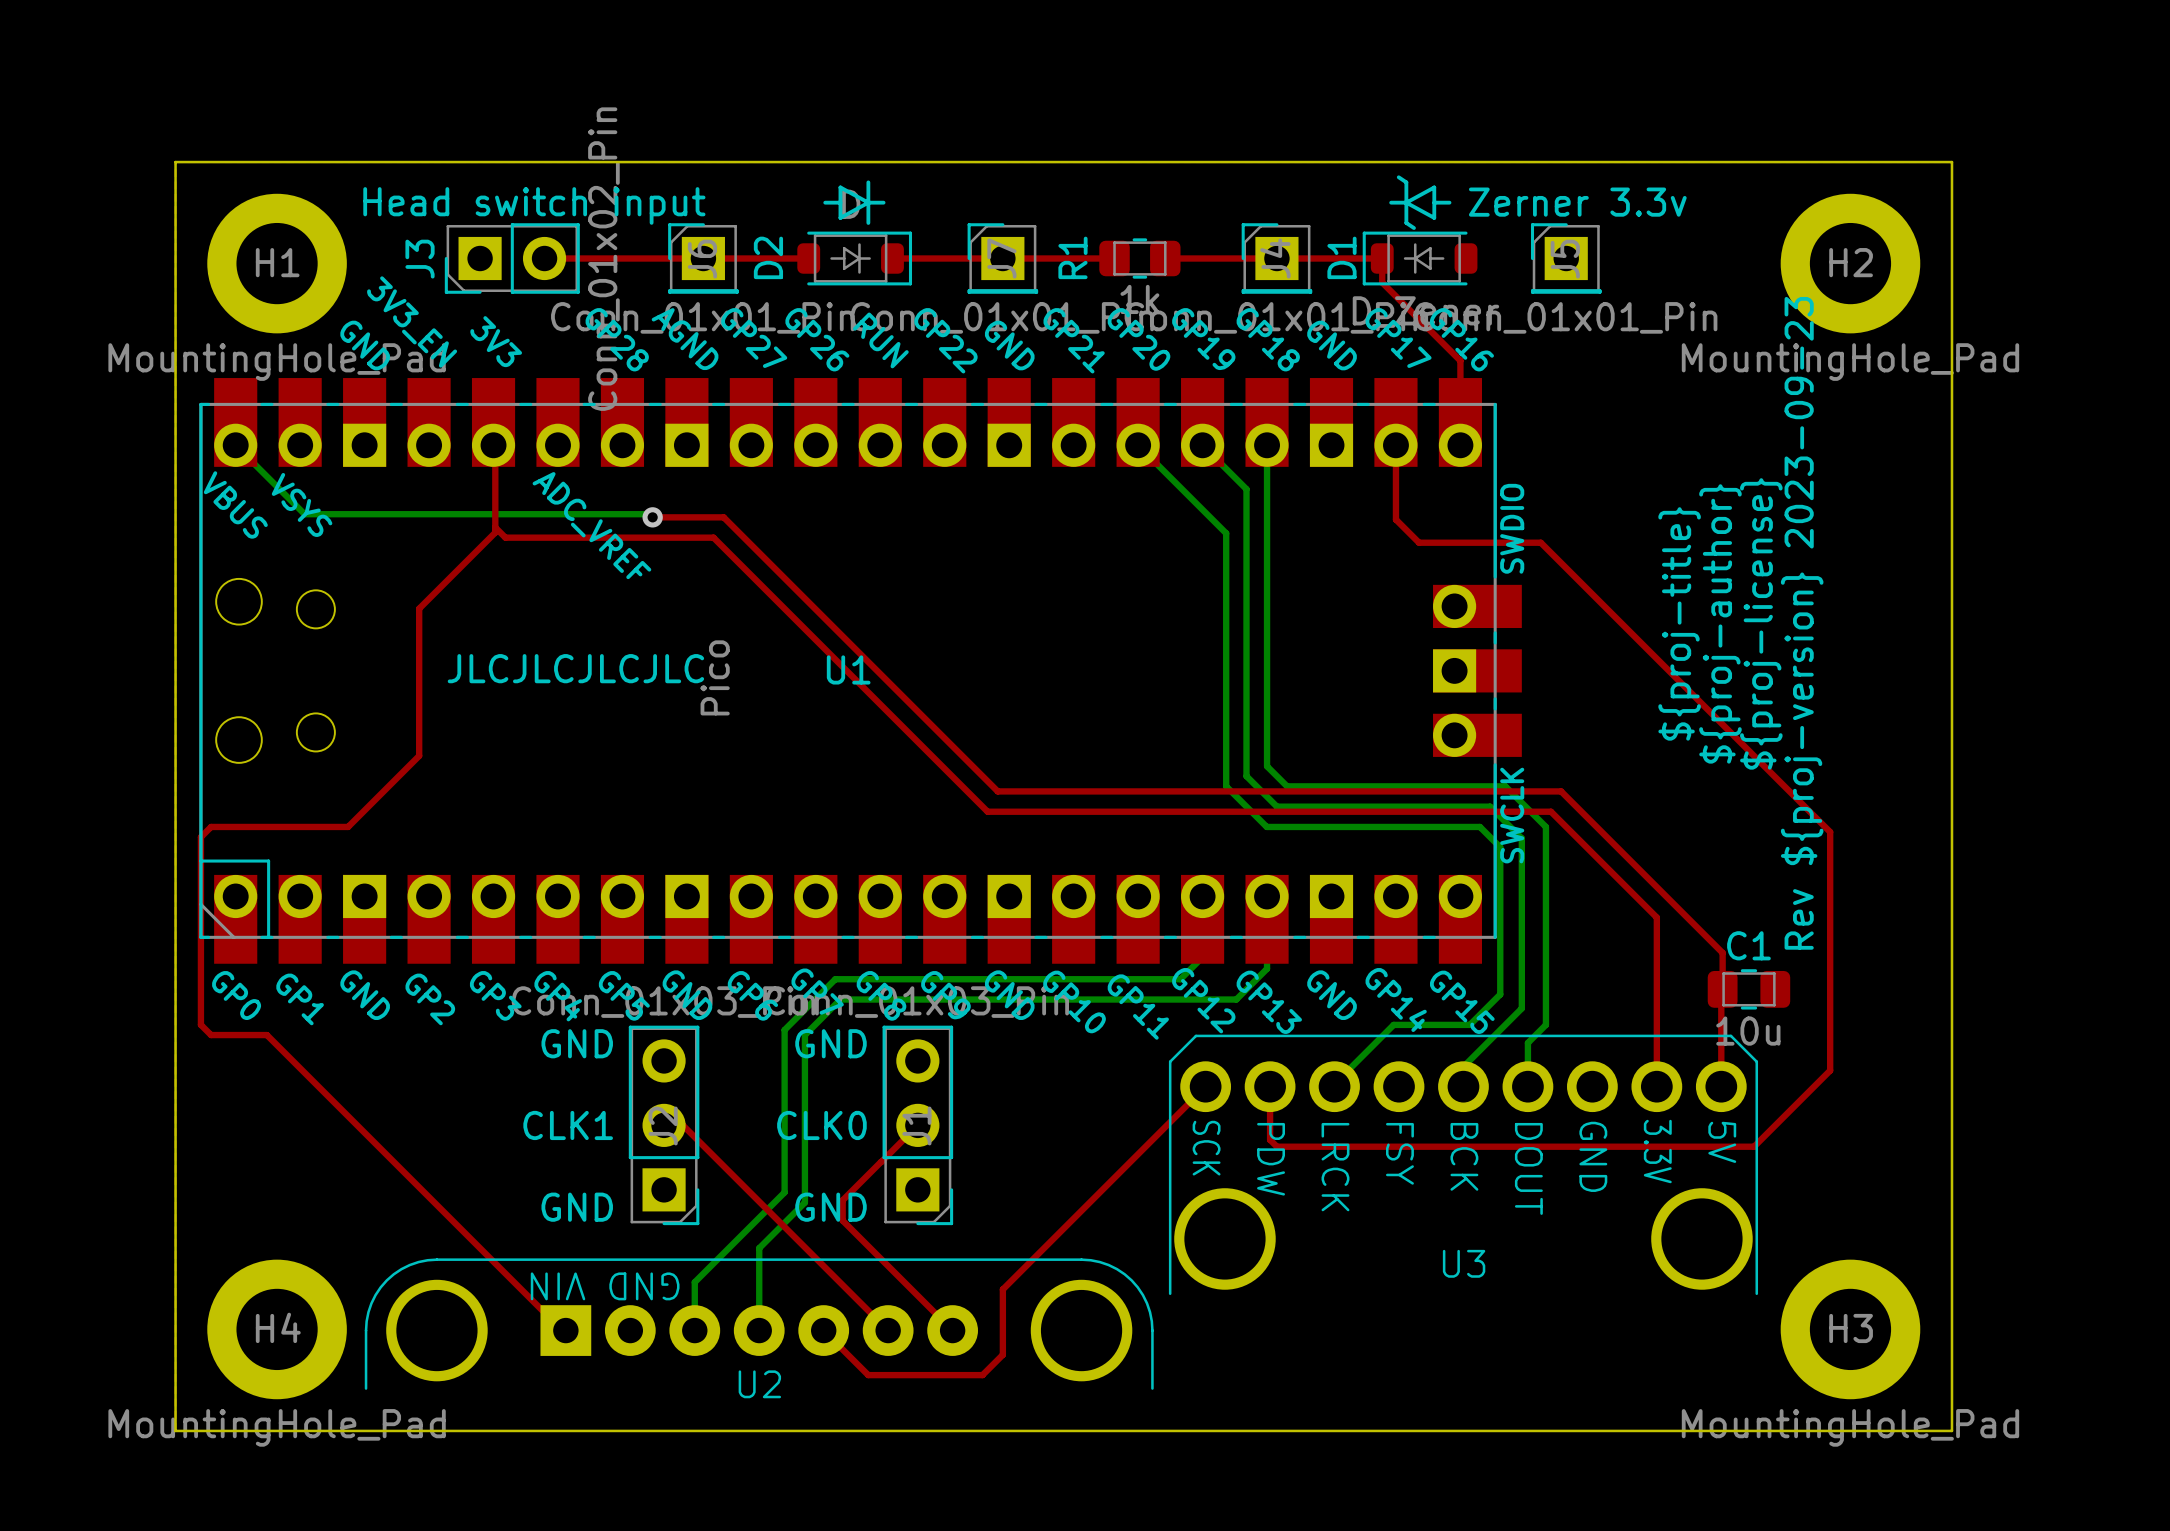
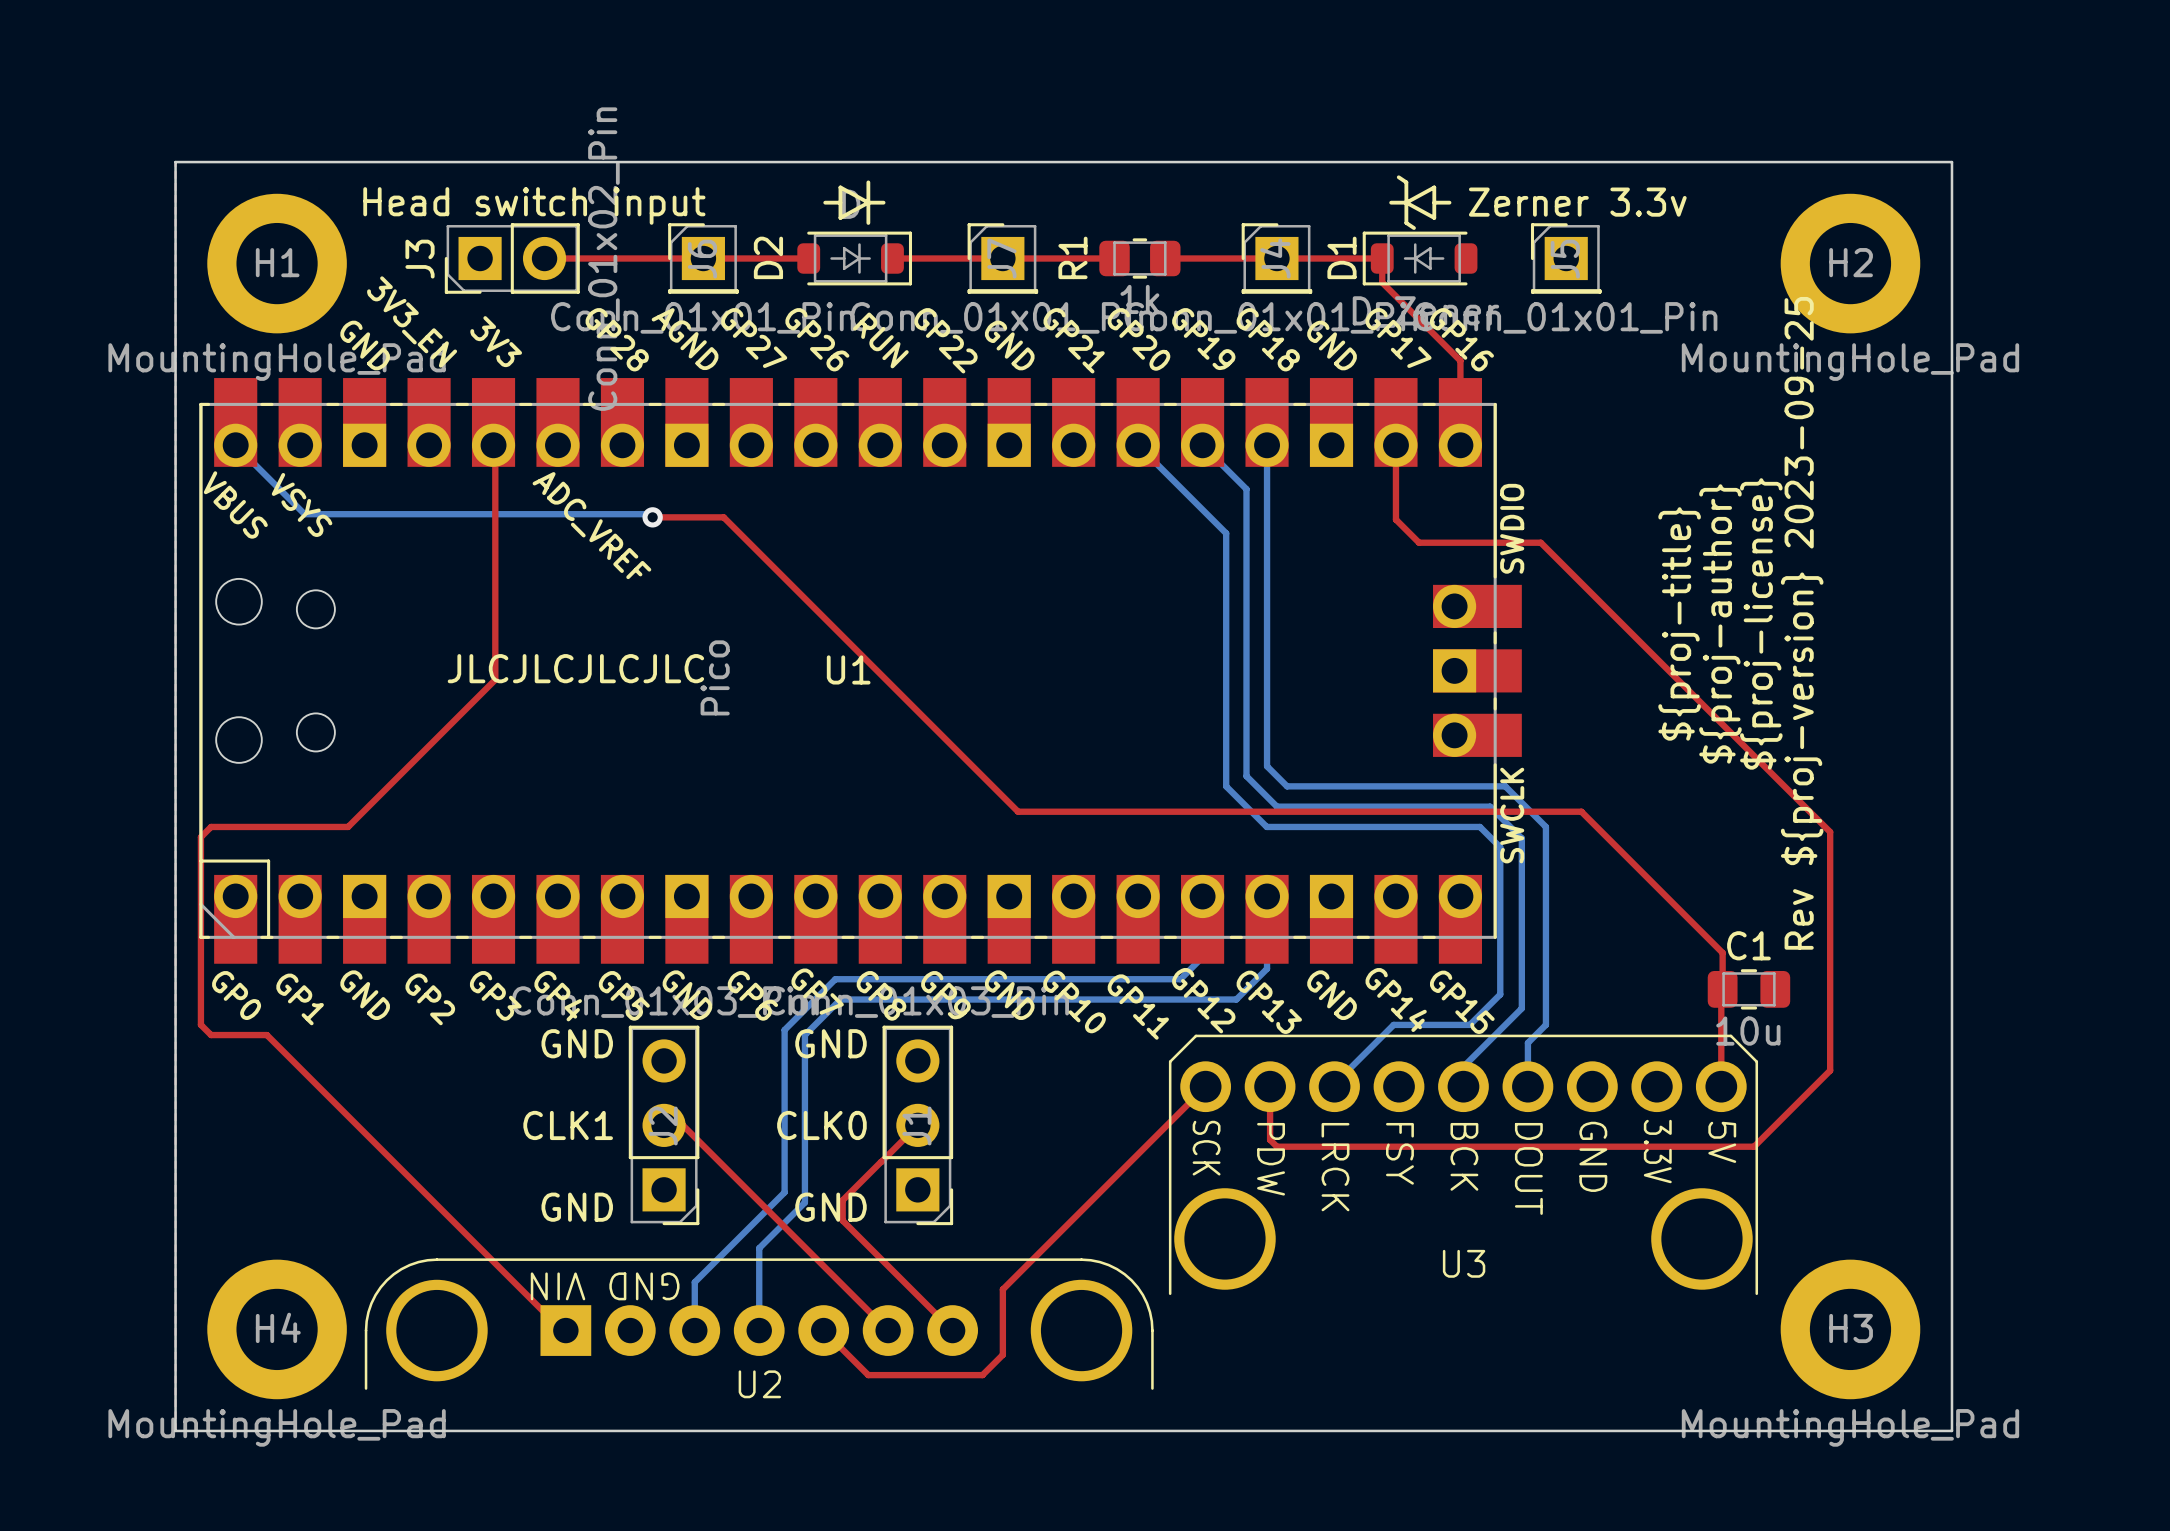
top track: (495, 527) (505, 537) (713, 537) (987, 811) (1018, 811) -> none
top track: (495, 532) (419, 608) (419, 755) -> (495, 532) (495, 679) (419, 755)
text: Rev ${proj-version} 2023-09-23 (1802, 623) -> Rev ${proj-version} 2023-09-25 (1802, 623)
top track: (997, 791) (1561, 791) (1581, 811) -> (997, 791) (1018, 811)
top track: (1551, 811) (1656, 917) (1656, 1086) -> (1551, 811) (1581, 811)

